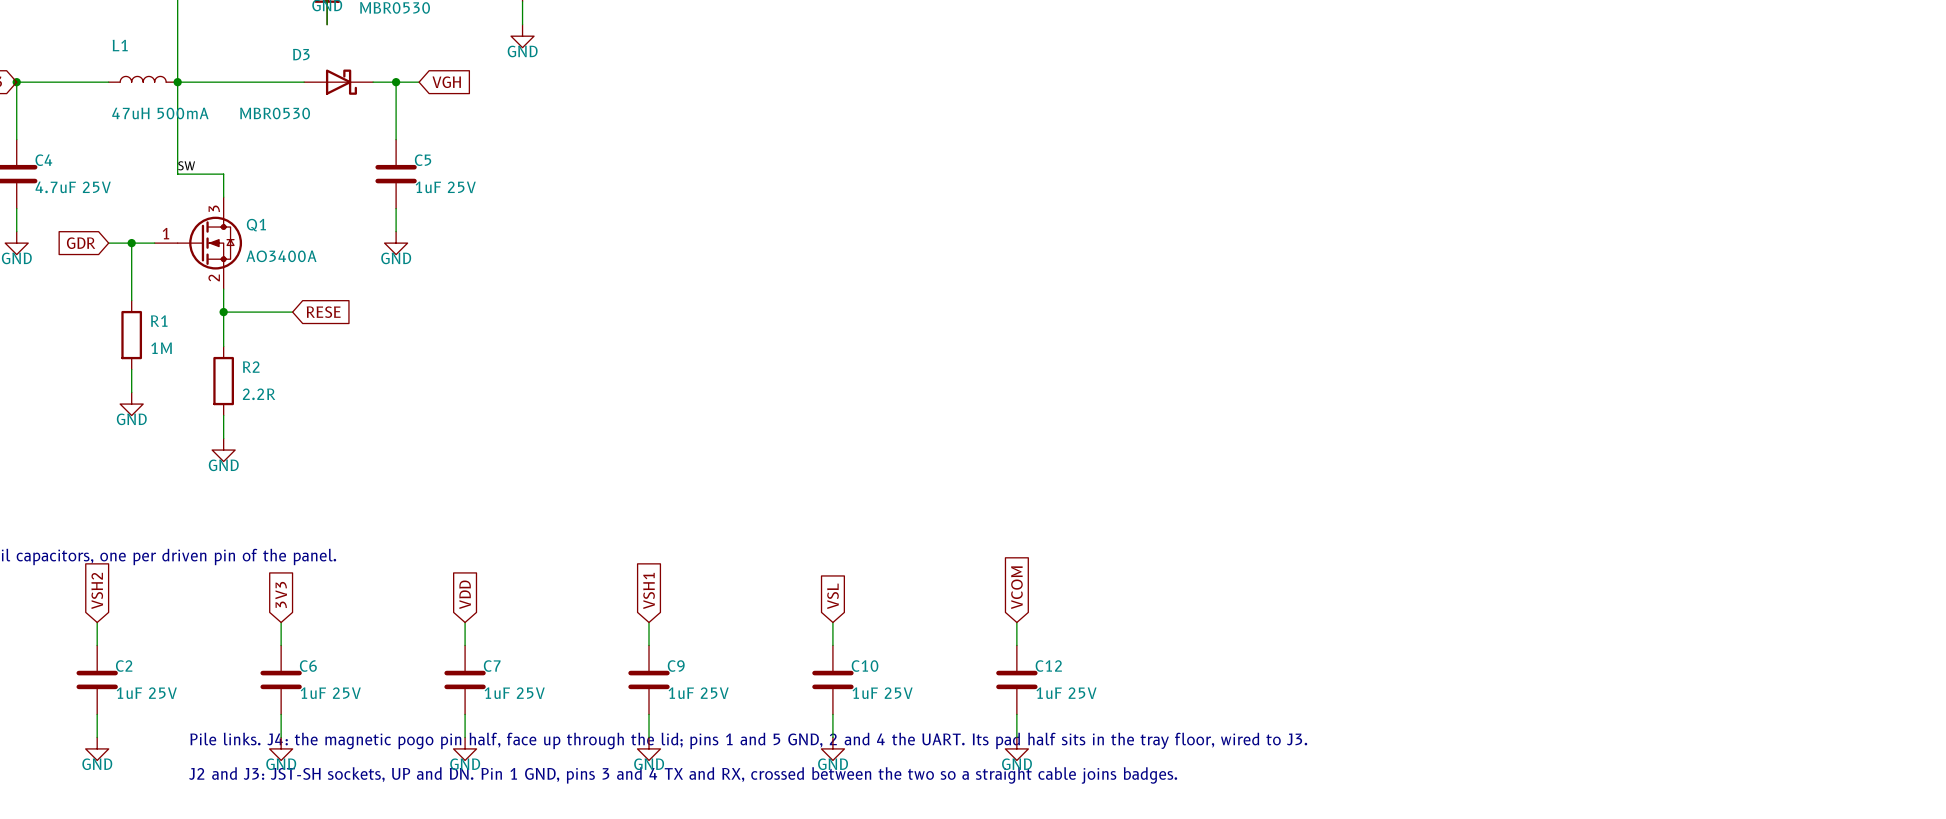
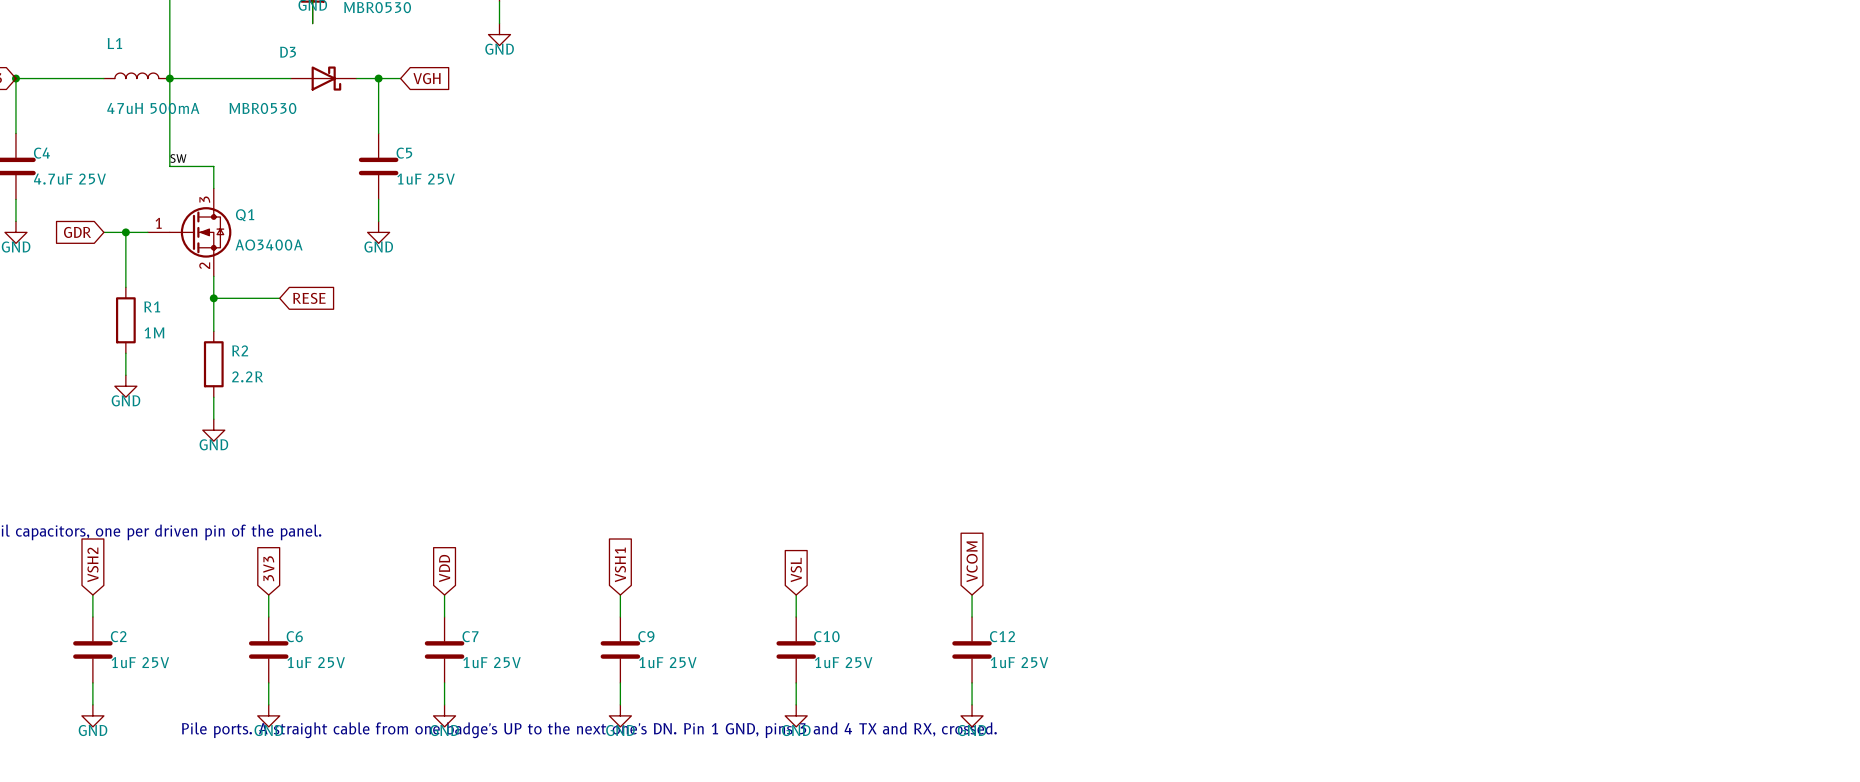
text: Pile links. J4: the magnetic pogo pin half, face up through the lid; pins 1 and 5 GND, 2 and 4 the UART. Its pad half sits in the tray floor, wired to J3. (748, 740) -> none
text: none -> Pile ports. A straight cable from one badge's UP to the next one's DN. Pin 1 GND, pins 3 and 4 TX and RX, crossed. (589, 730)
text: J2 and J3: JST-SH sockets, UP and DN. Pin 1 GND, pins 3 and 4 TX and RX, crossed between the two so a straight cable joins badges. (683, 775) -> none

